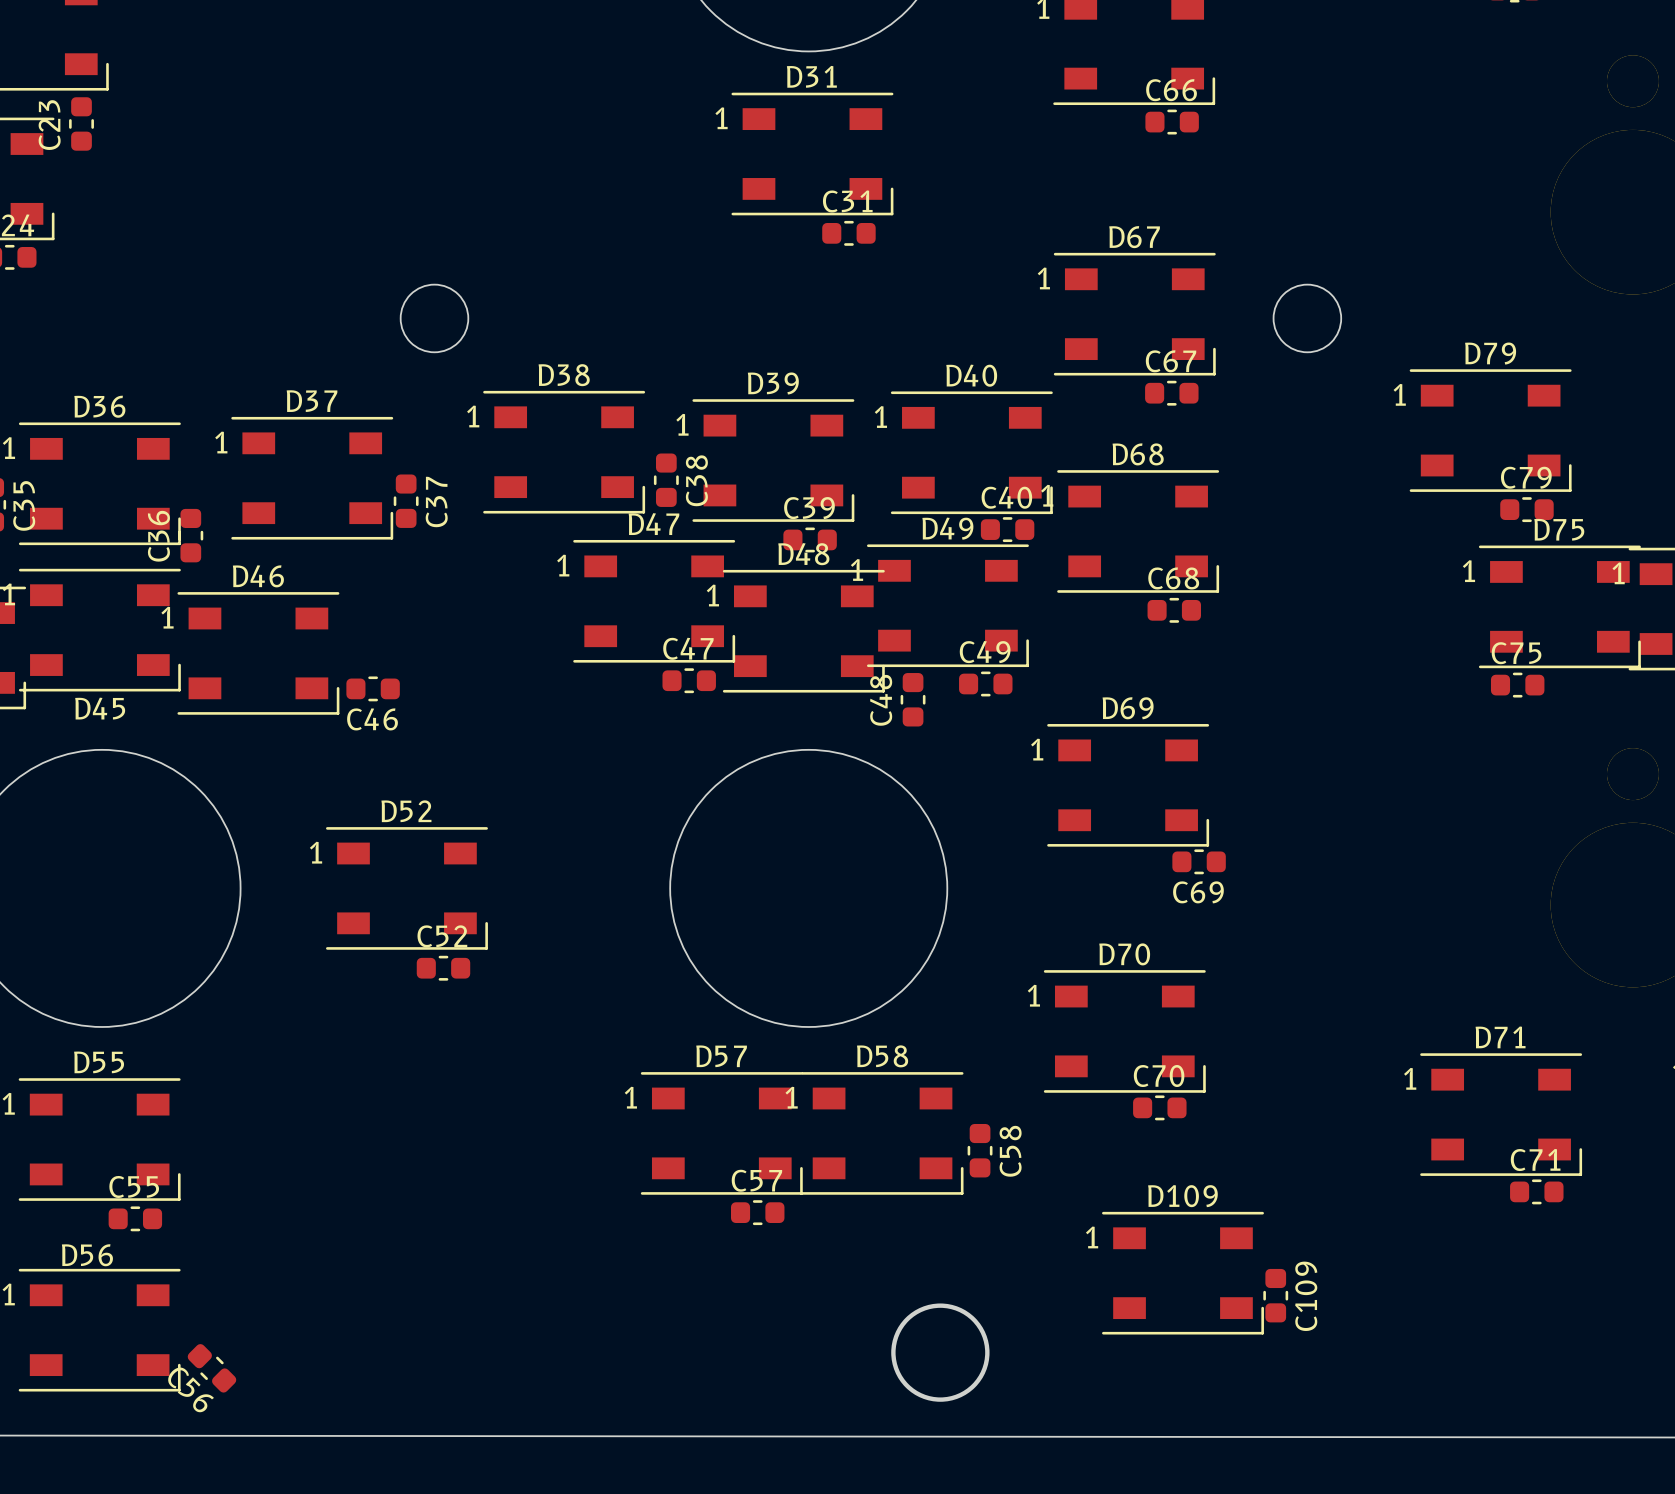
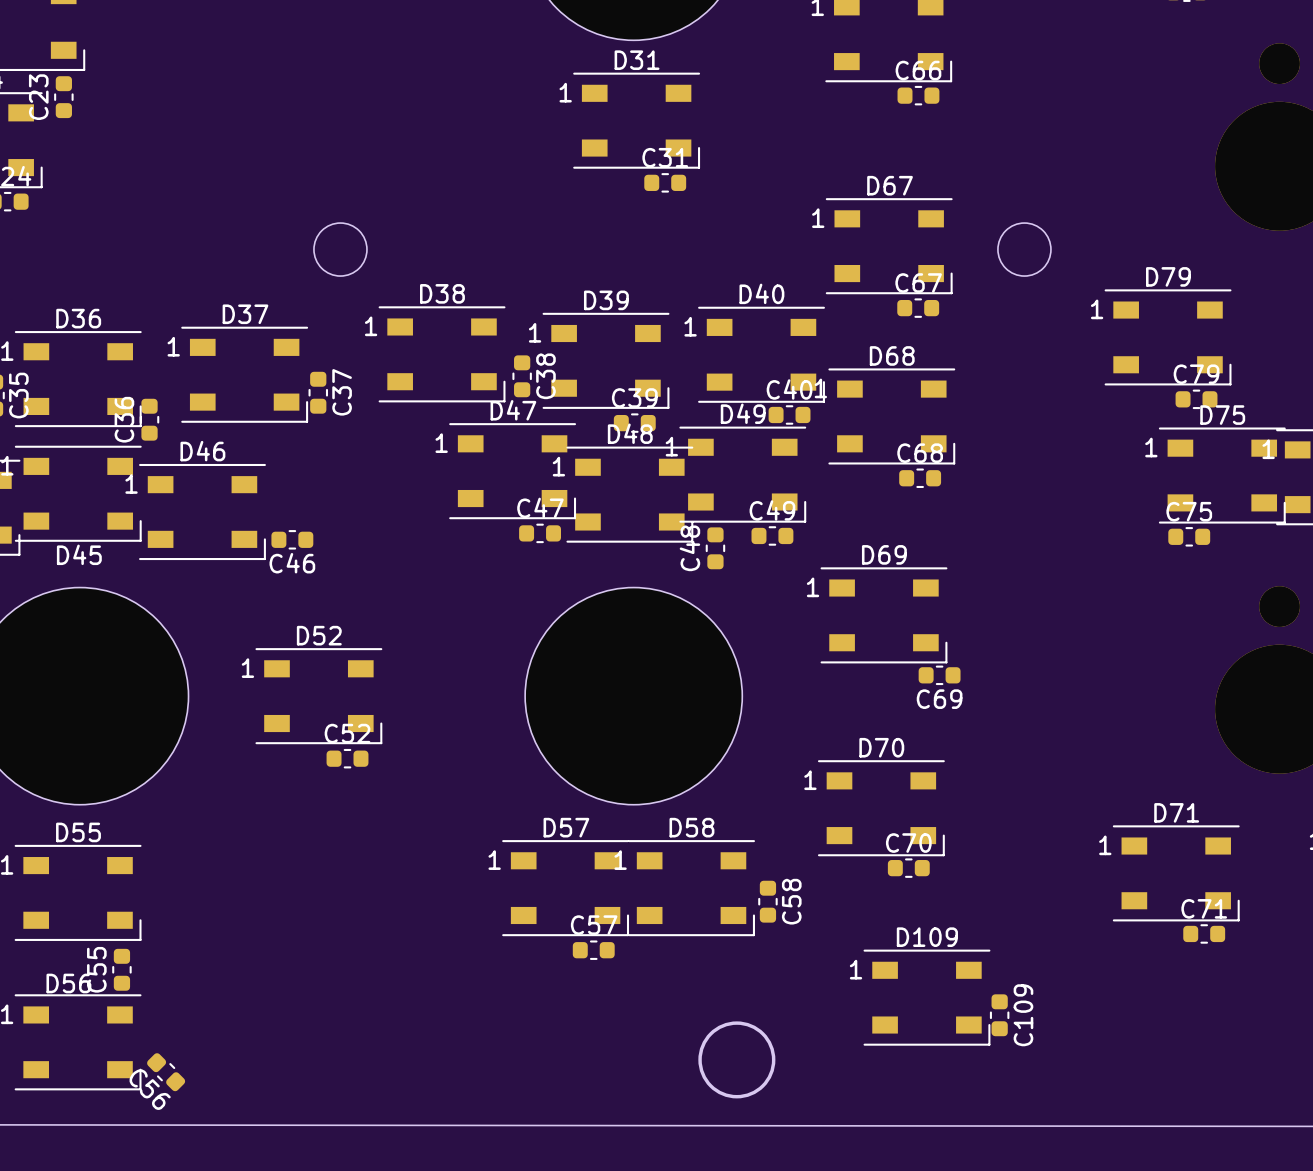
C55 name position: C55 (134, 1186) -> C55 (96, 969)
C55 rotation: 0° (135, 1218) -> 90° clockwise (121, 969)

